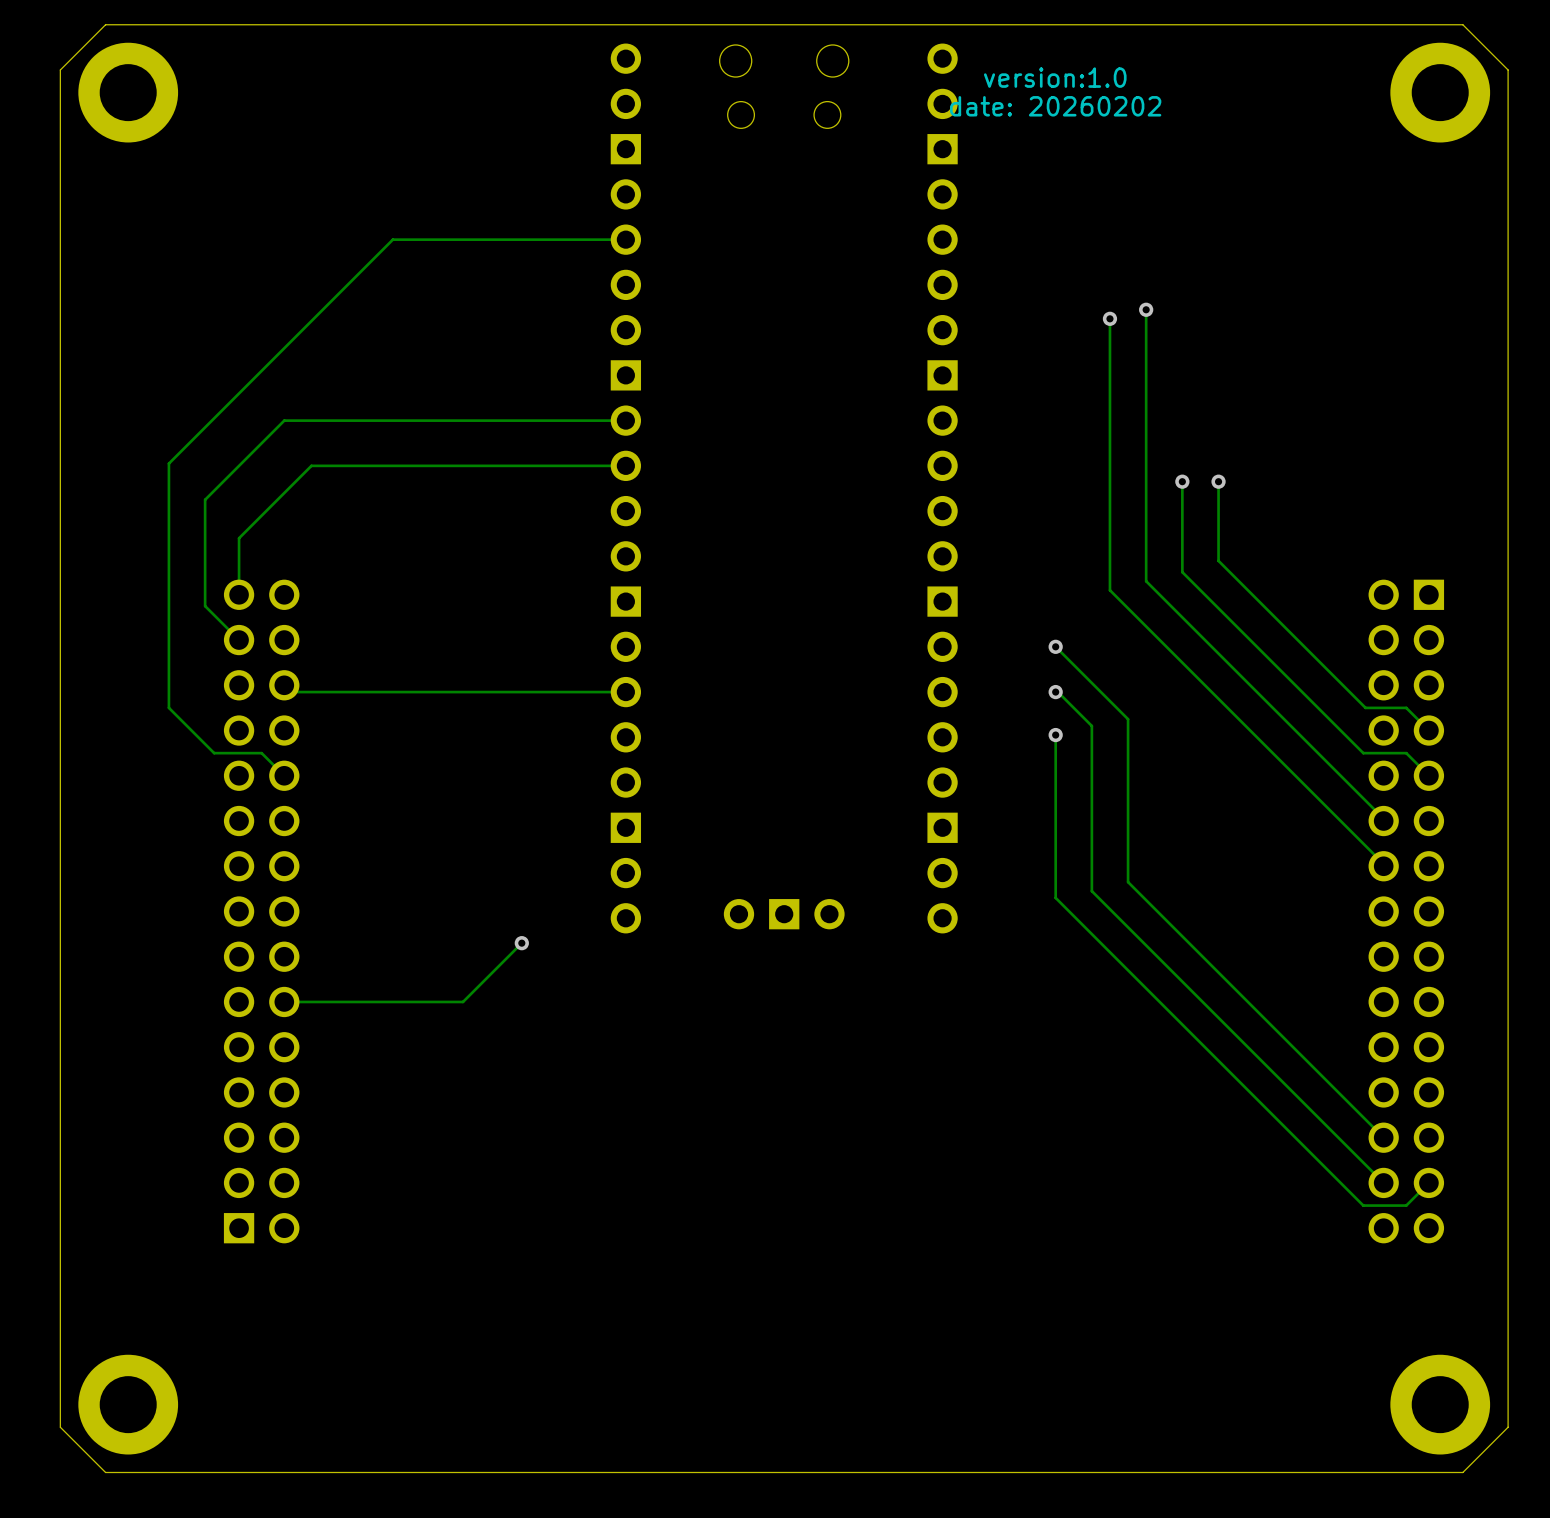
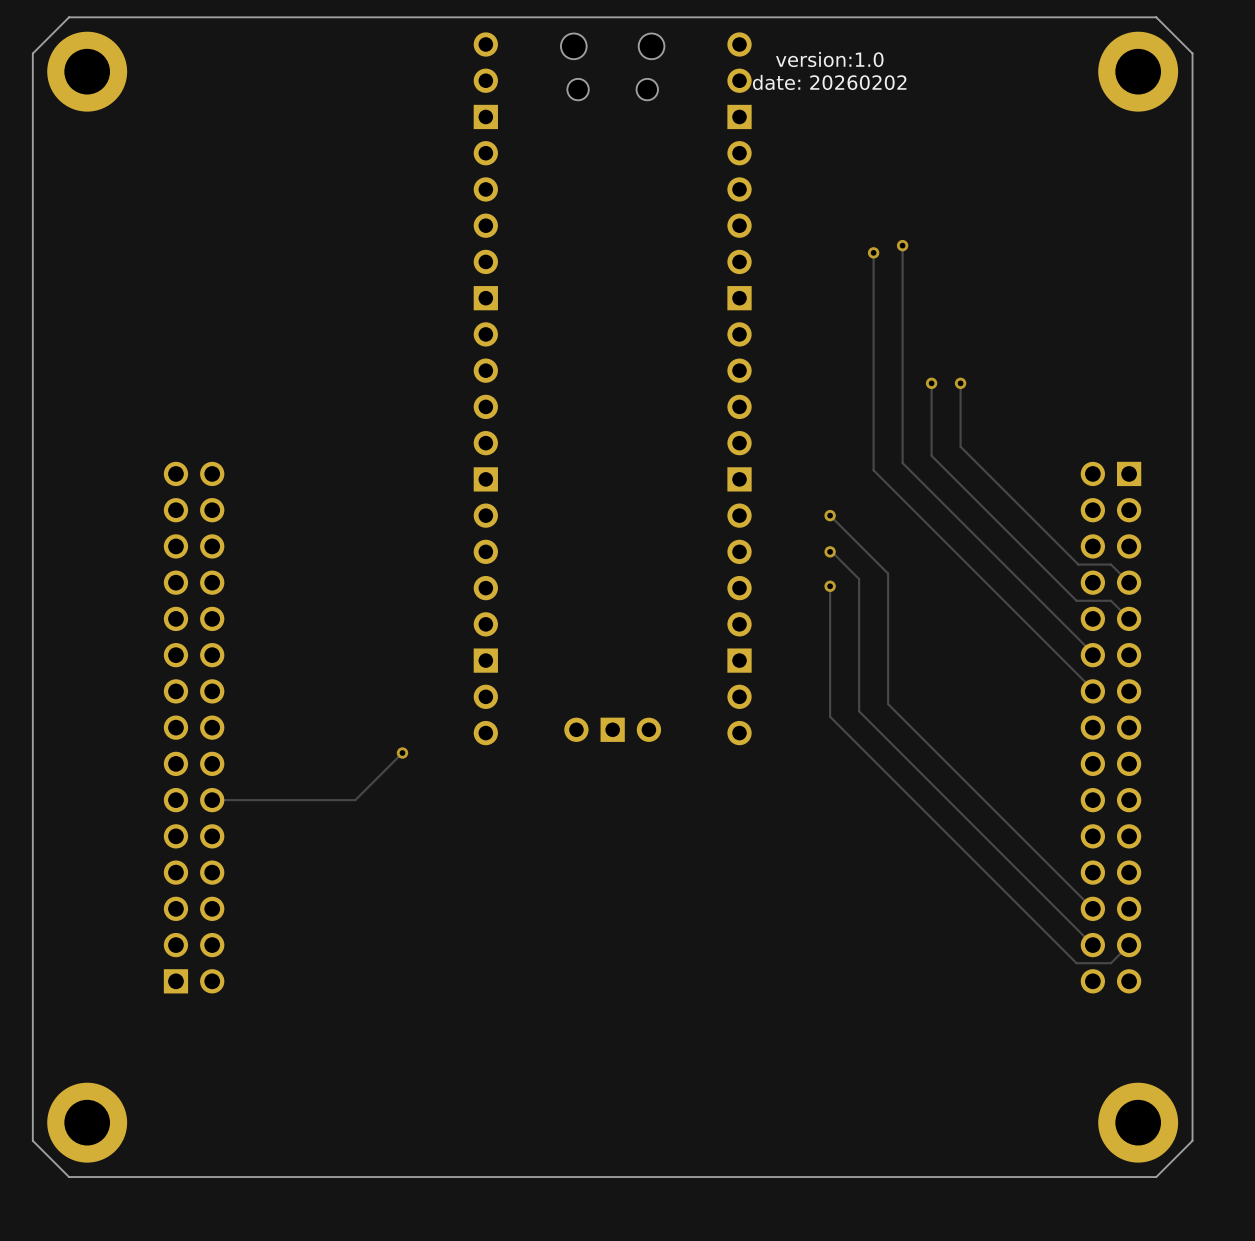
track: (625, 239) (392, 239) (168, 463) (168, 707) (214, 753) (261, 753) (284, 775) -> none
track: (625, 420) (284, 420) (205, 499) (205, 606) (239, 640) -> none
track: (625, 465) (311, 465) (239, 538) (239, 594) -> none
track: (284, 685) (291, 692) (625, 692) -> none

